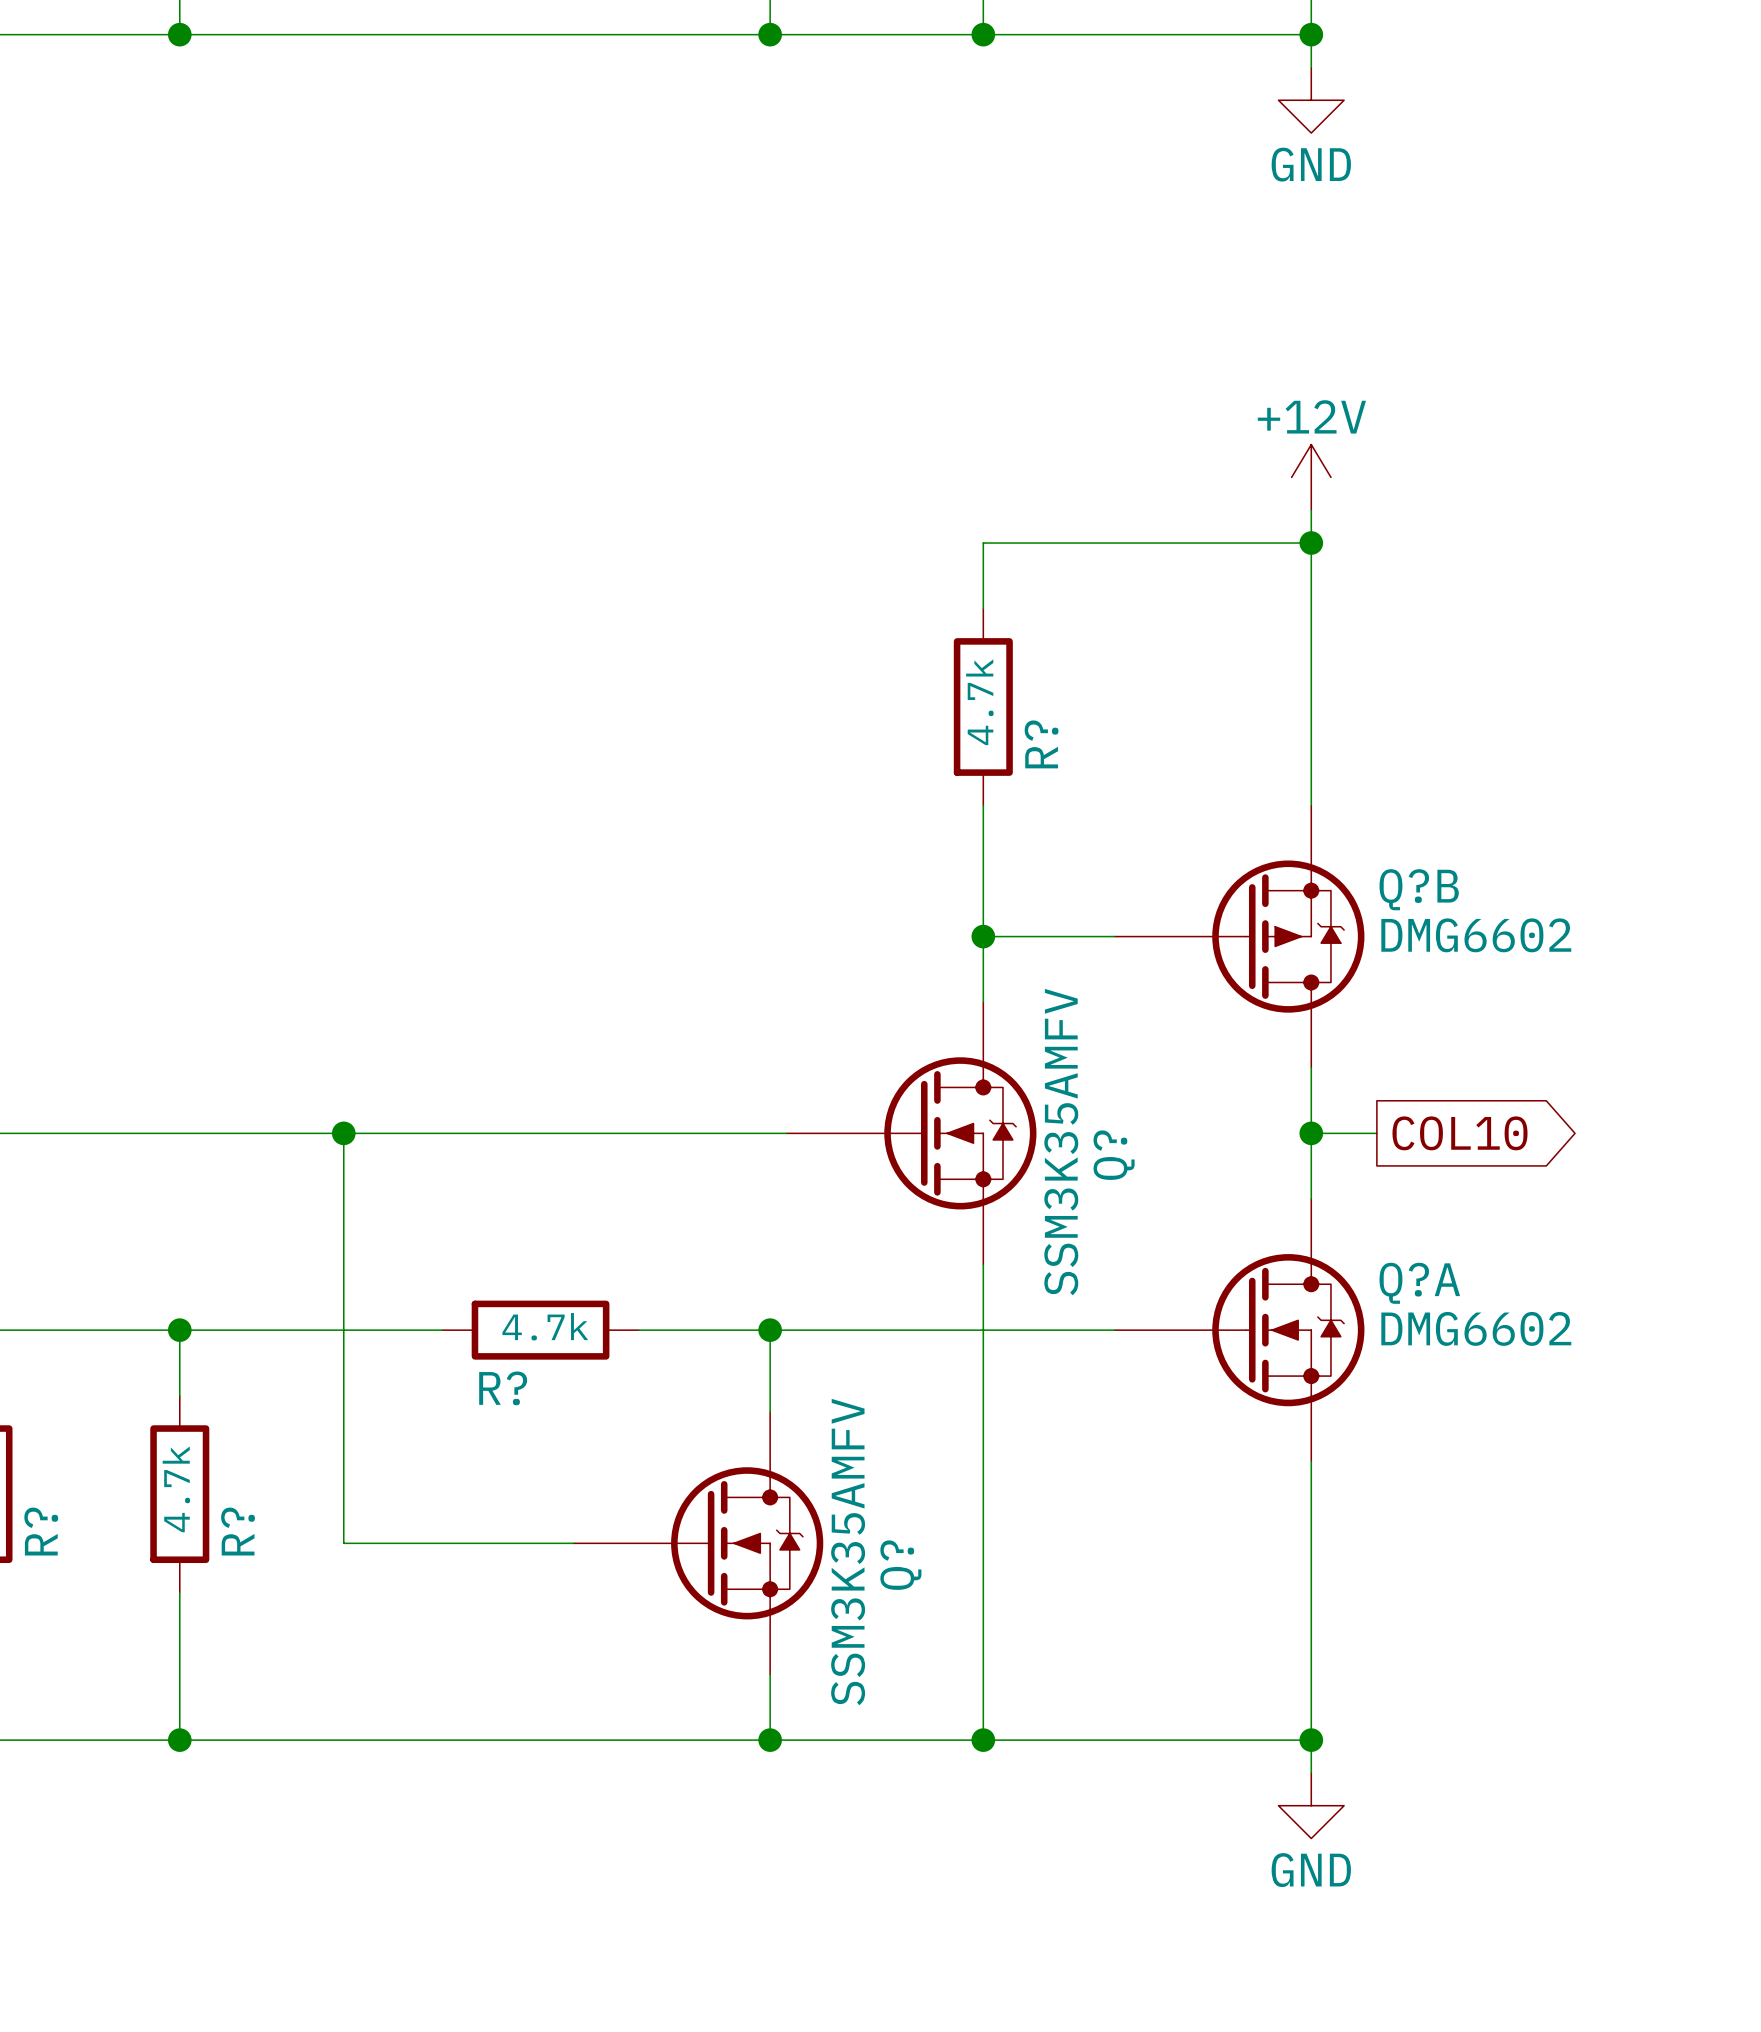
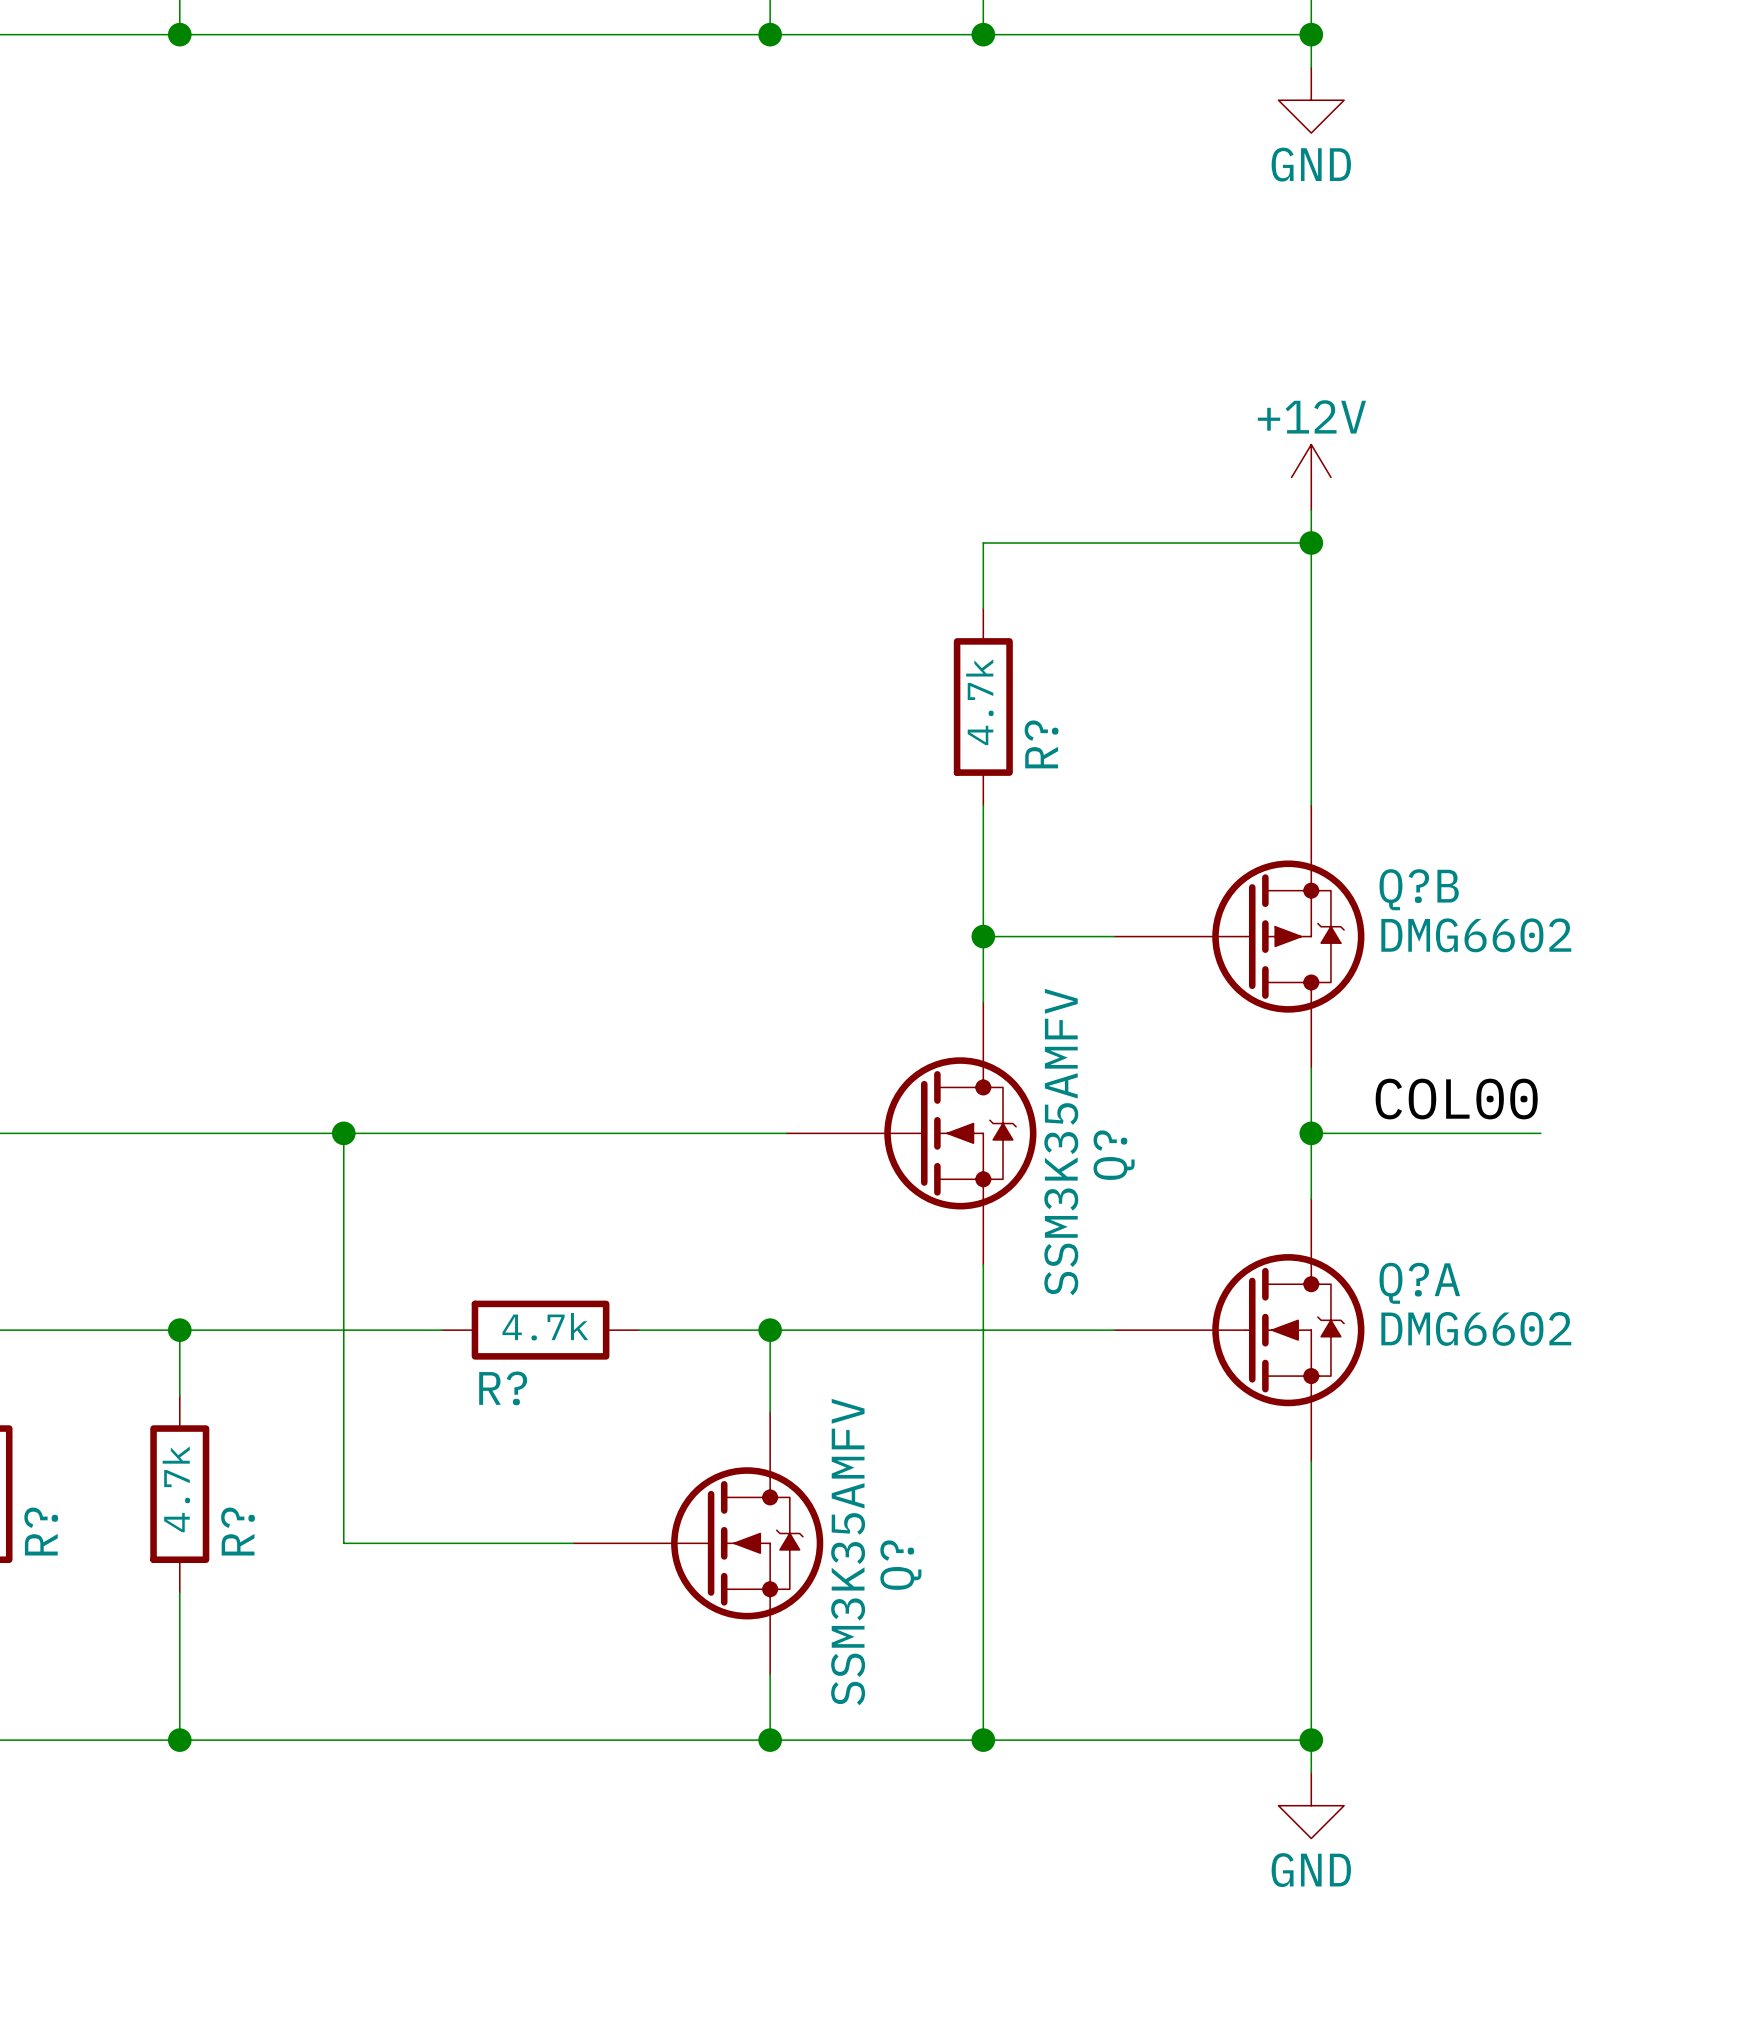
label: none -> COL00 (1456, 1099)
wire: none -> (1376, 1133) (1540, 1133)
global label: COL10 (1460, 1133) -> none

